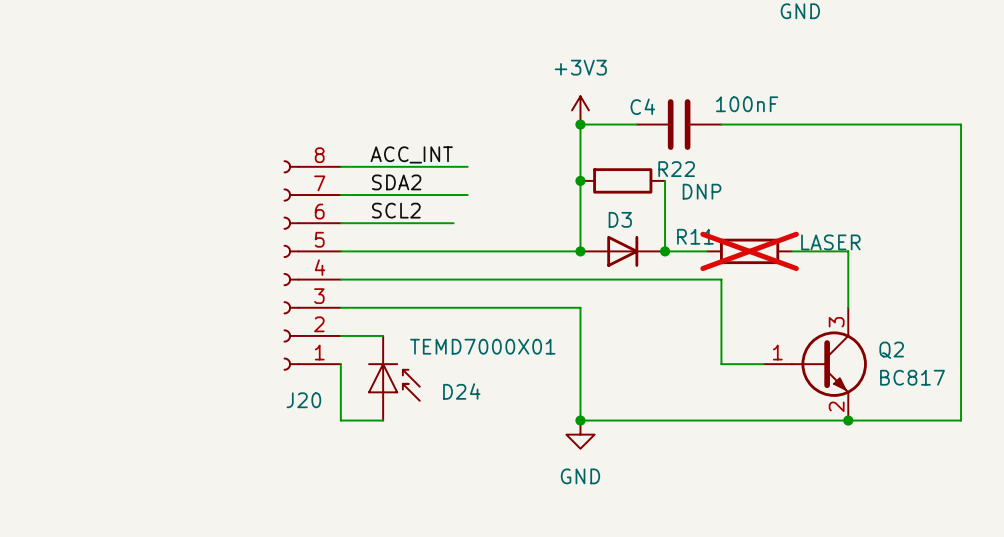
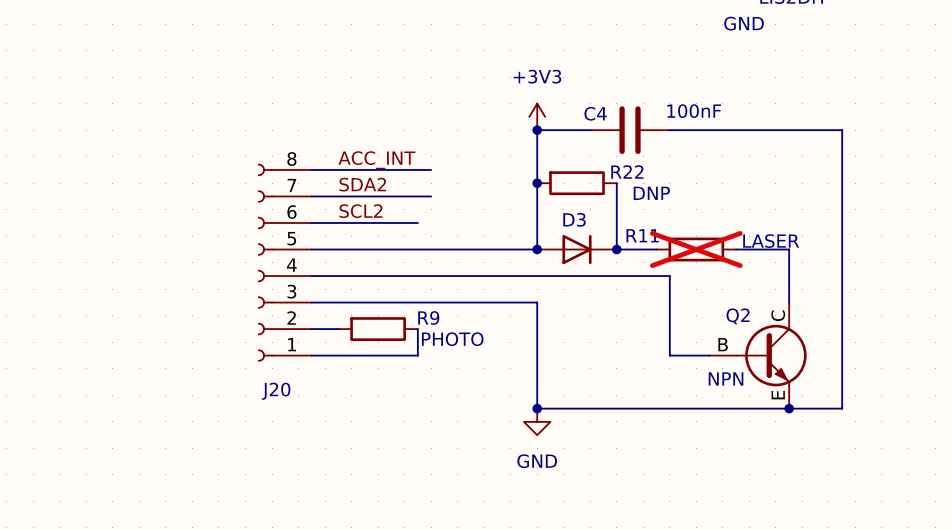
wire: (904, 124) (961, 124) (961, 420) (904, 420) -> (842, 130) (842, 408)
Q2 symbol: [763, 307, 867, 421] -> [709, 302, 807, 409]
R9: none -> PHOTO (378, 329)
Q2 name position: Q2 (891, 350) -> Q2 (738, 316)
wire: (340, 364) (340, 420) (383, 420) -> (311, 355) (417, 355) (417, 329)
Q2 value: BC817 (912, 377) -> NPN (726, 378)
D24: TEMD7000X01 (393, 378) -> none

